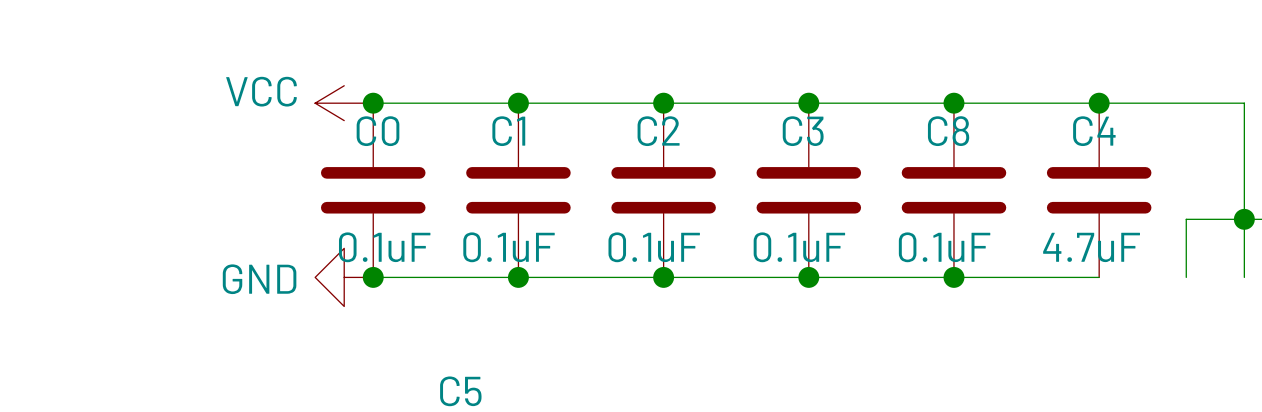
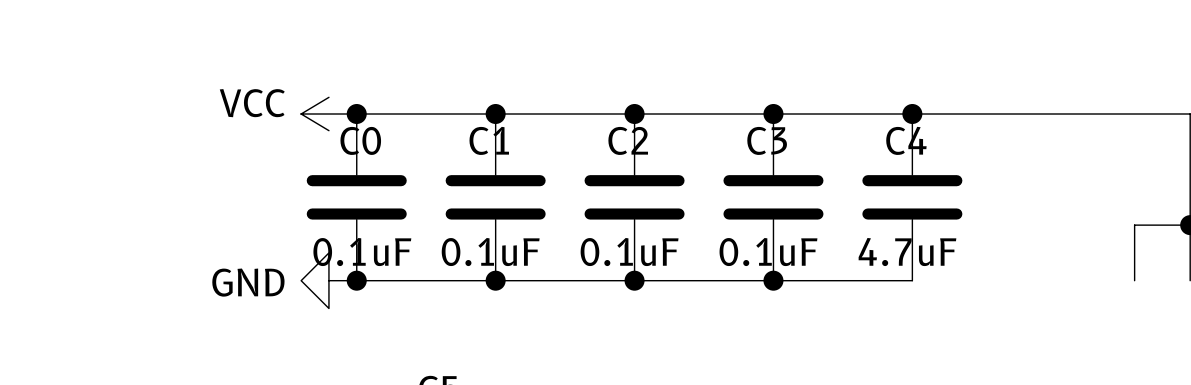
junction: (1099, 103) -> none
C8 name: C8 (948, 131) -> C4 (906, 140)
C4: 4.7uF (1099, 190) -> none
C8 value: 0.1uF (944, 247) -> 4.7uF (907, 252)
wire: (953, 277) (1099, 277) -> none
junction: (953, 277) -> none

